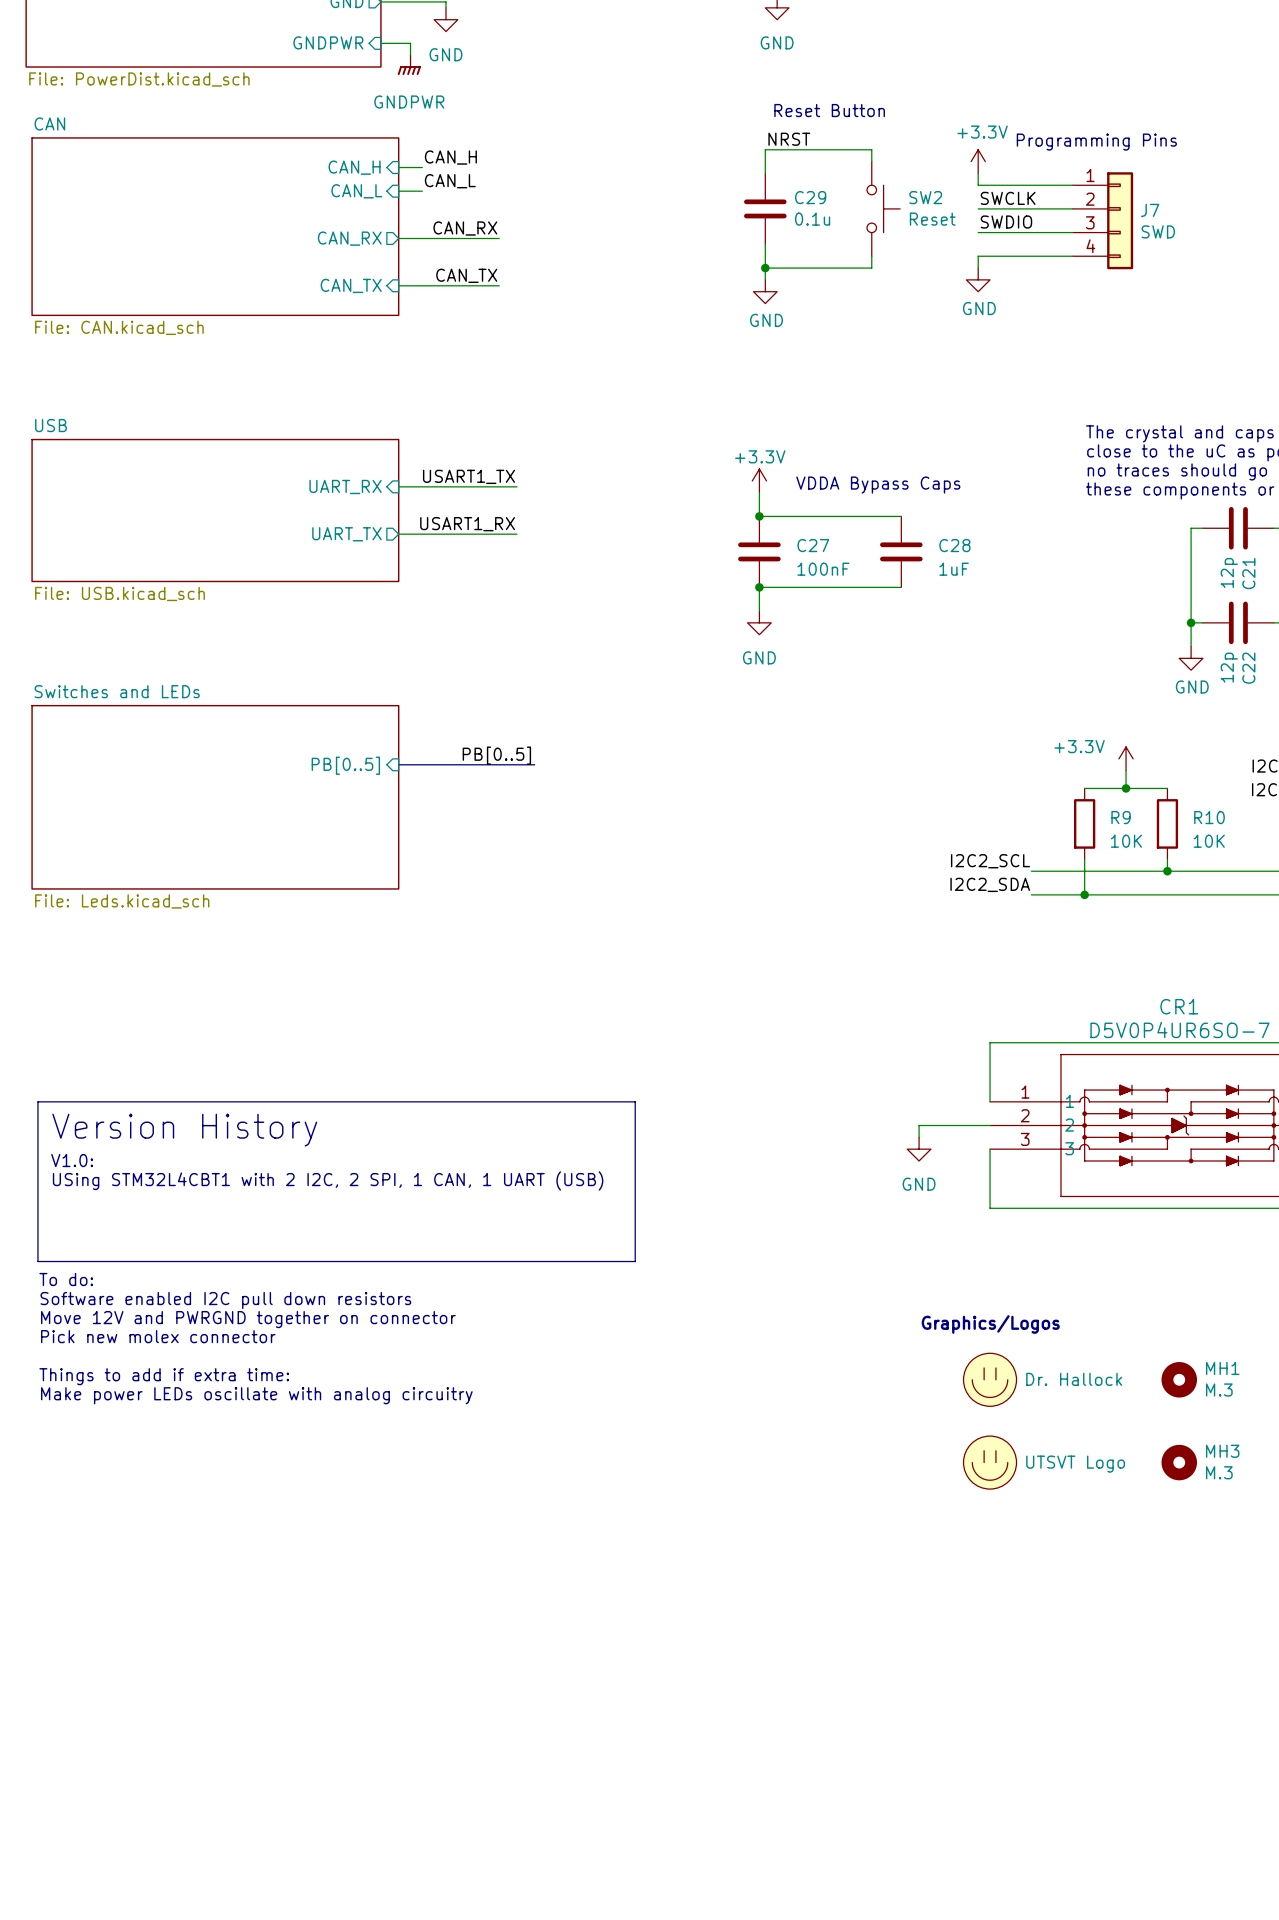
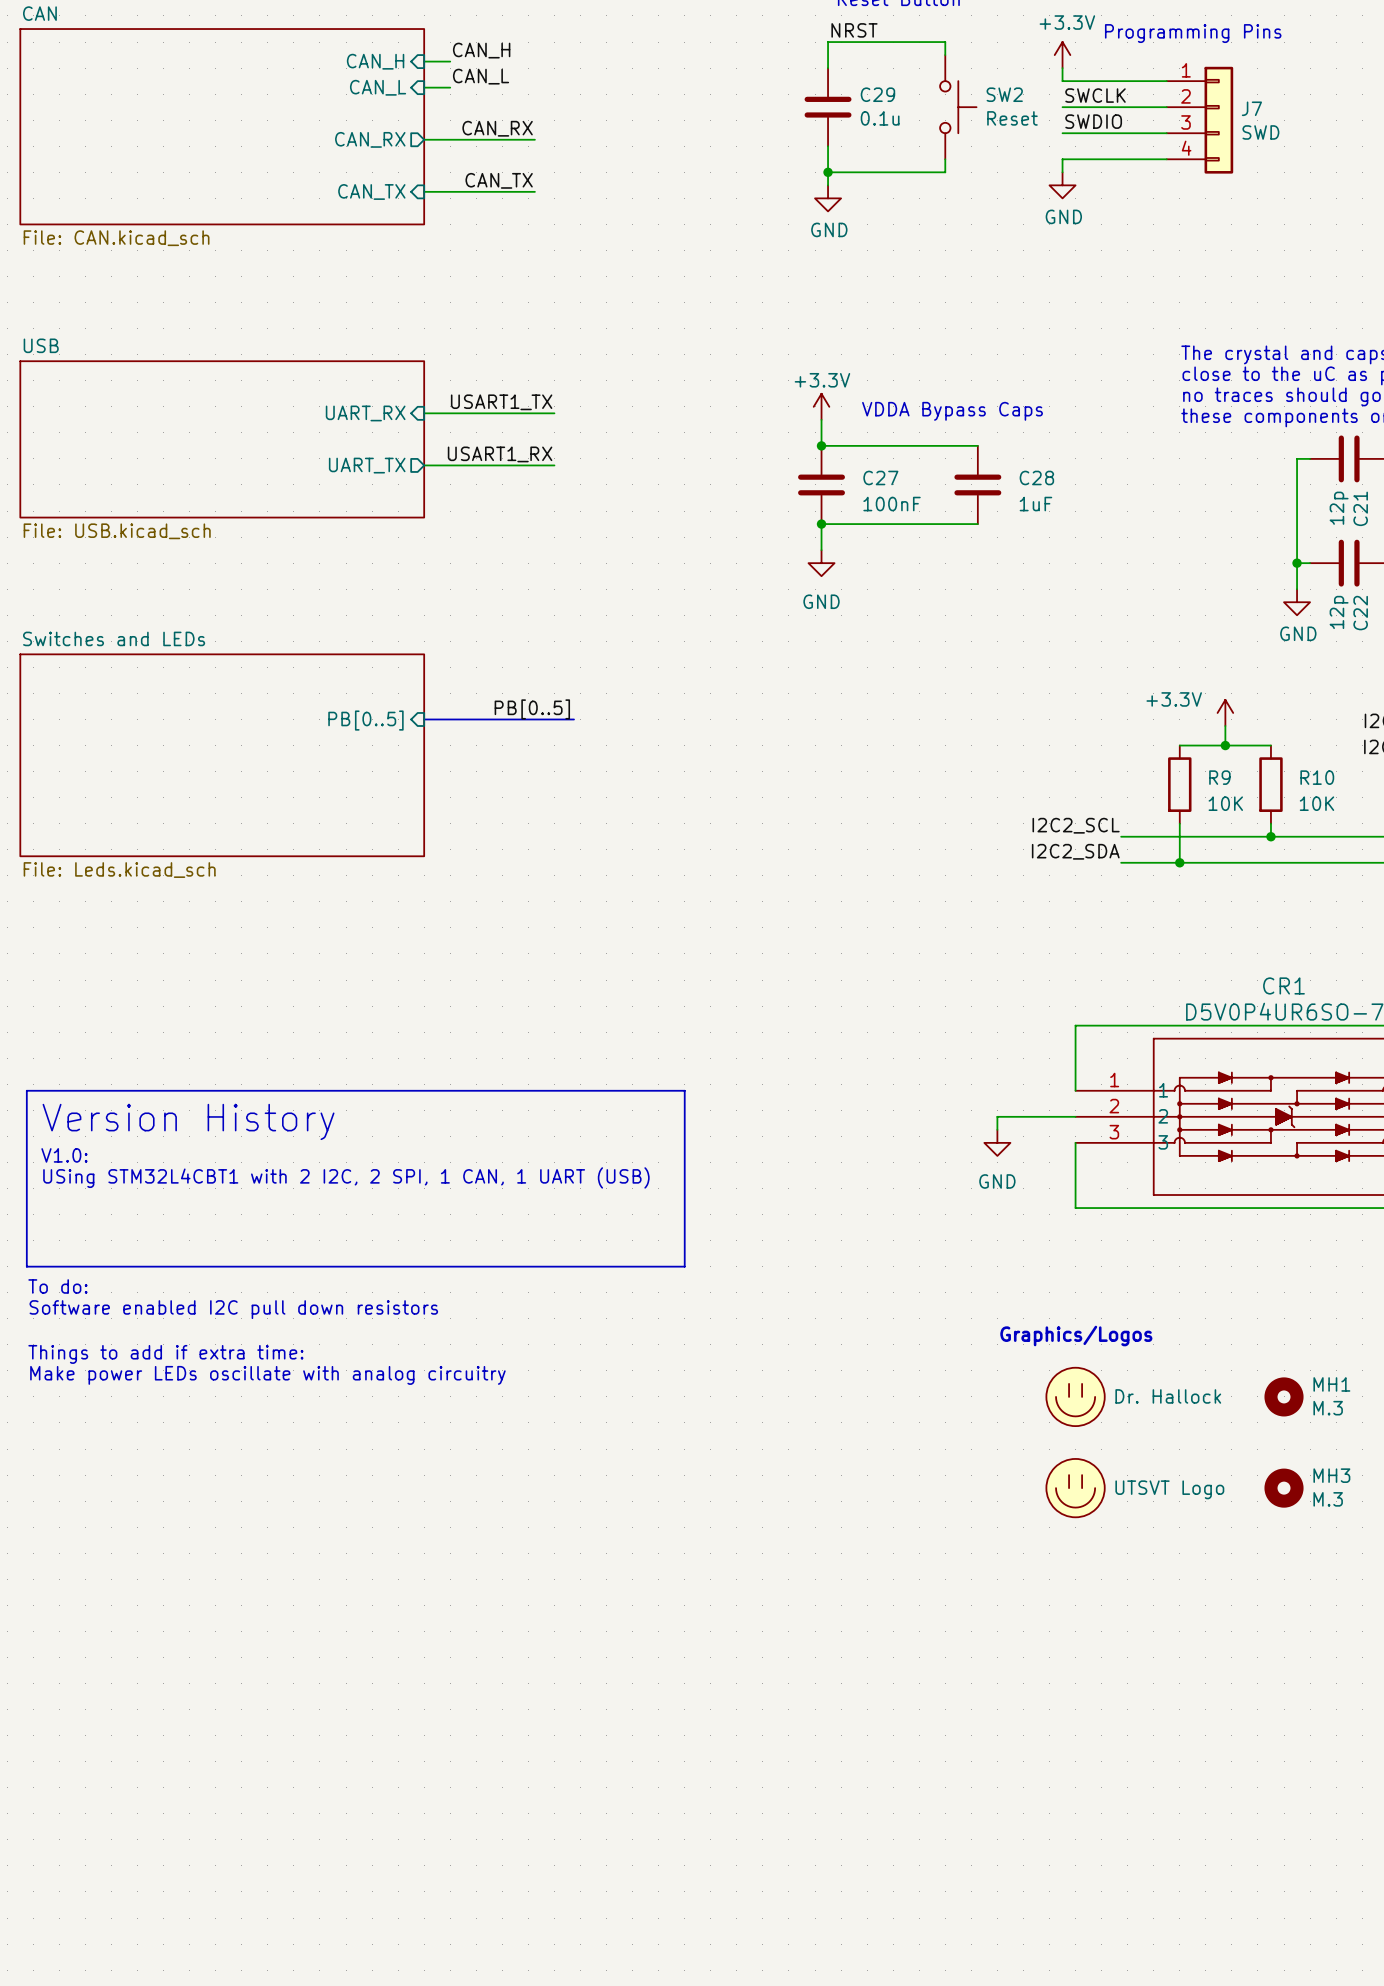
text: Move 12V and PWRGND together on connector (248, 1319) -> none
text: Pick new molex connector (158, 1336) -> Things to add if extra time: (165, 1354)
text: Things to add if extra time: (164, 1376) -> none
text position: Make power LEDs oscillate with analog circuitry (256, 1395) -> Make power LEDs oscillate with analog circuitry (267, 1375)

